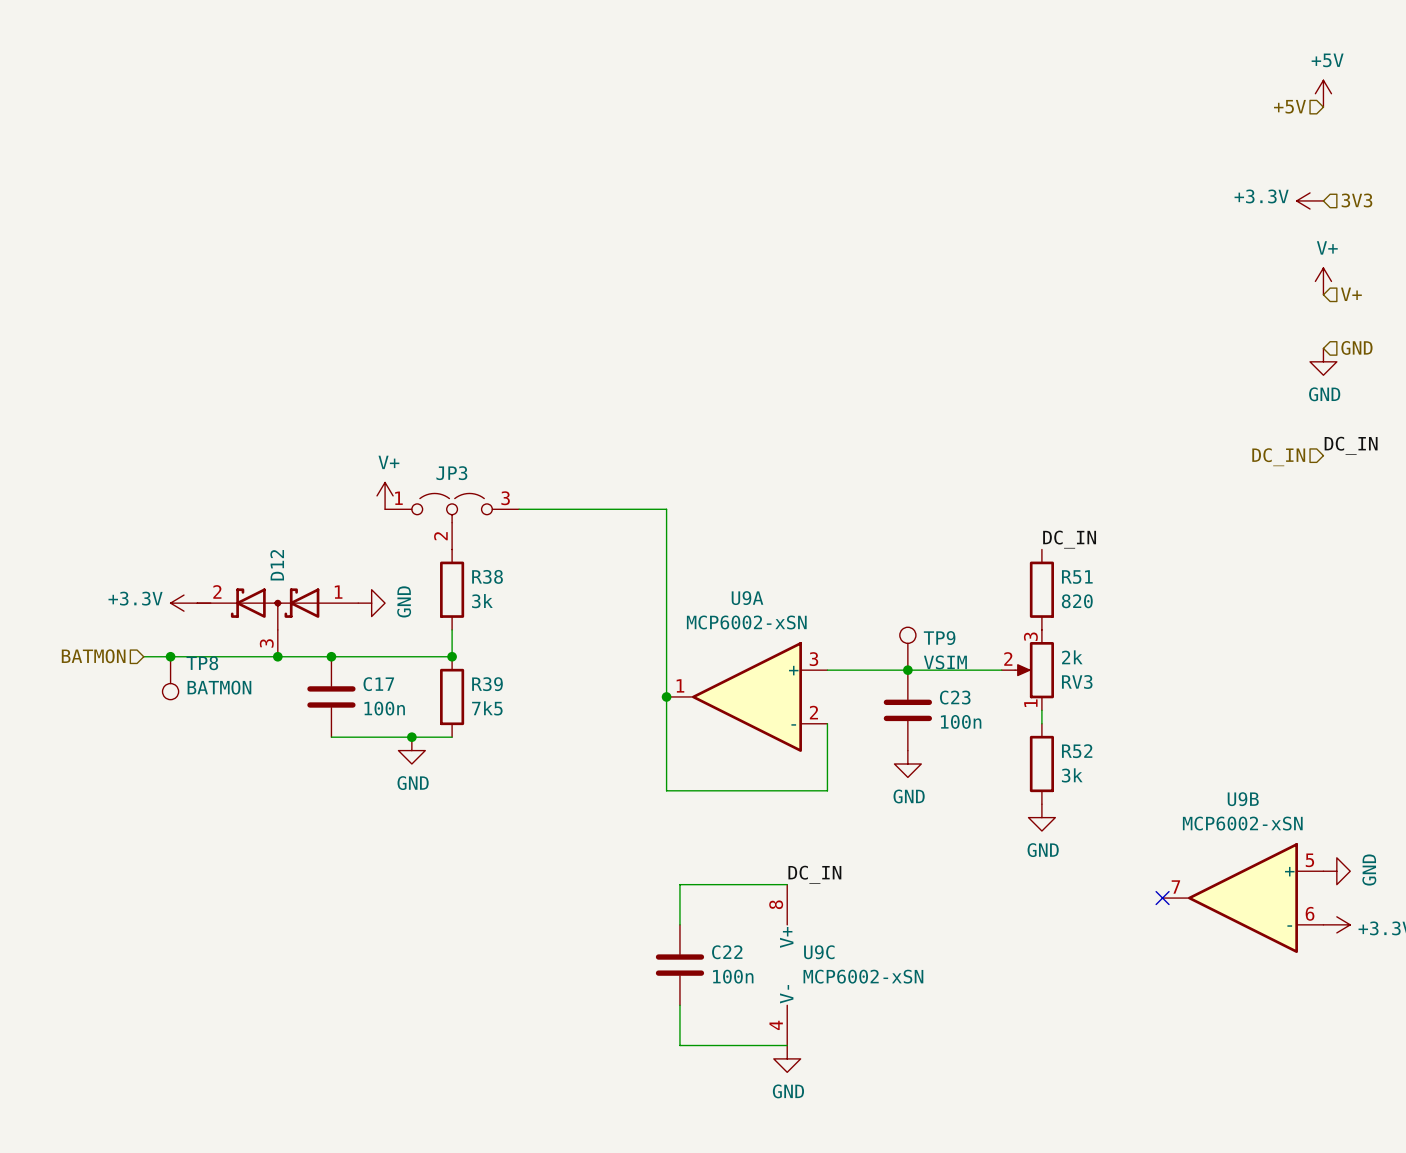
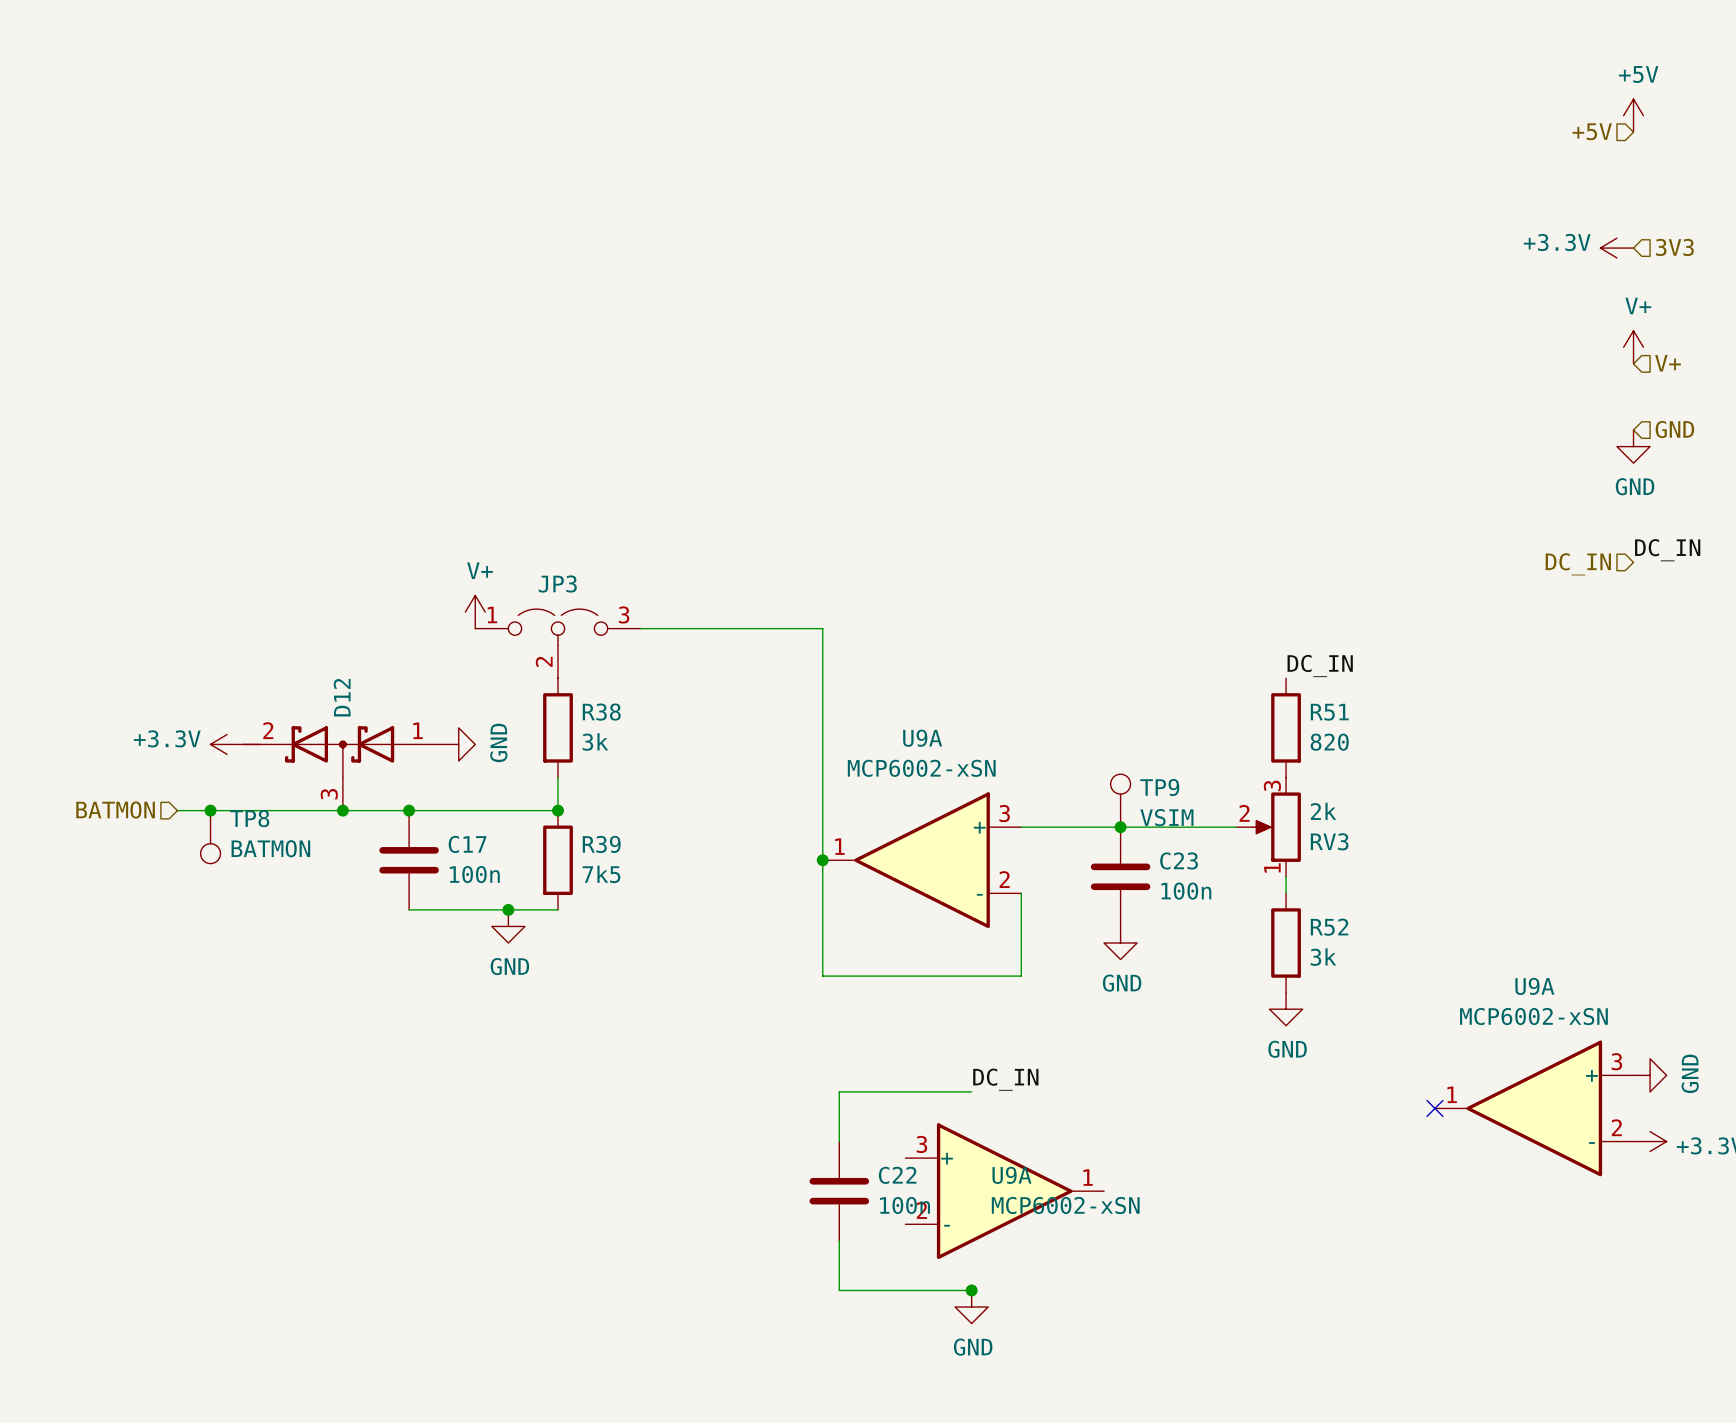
U9B name: U9B (1243, 799) -> U9A (1534, 986)
U9B pin number: 5 (1309, 860) -> 3 (1616, 1061)
U9B pin number: 7 (1175, 886) -> 1 (1452, 1094)
U9B pin number: 6 (1310, 913) -> 2 (1616, 1127)
U9C: MCP6002-xSN (787, 965) -> none
U9A: none -> MCP6002-xSN (1004, 1191)
junction: none -> (971, 1290)

